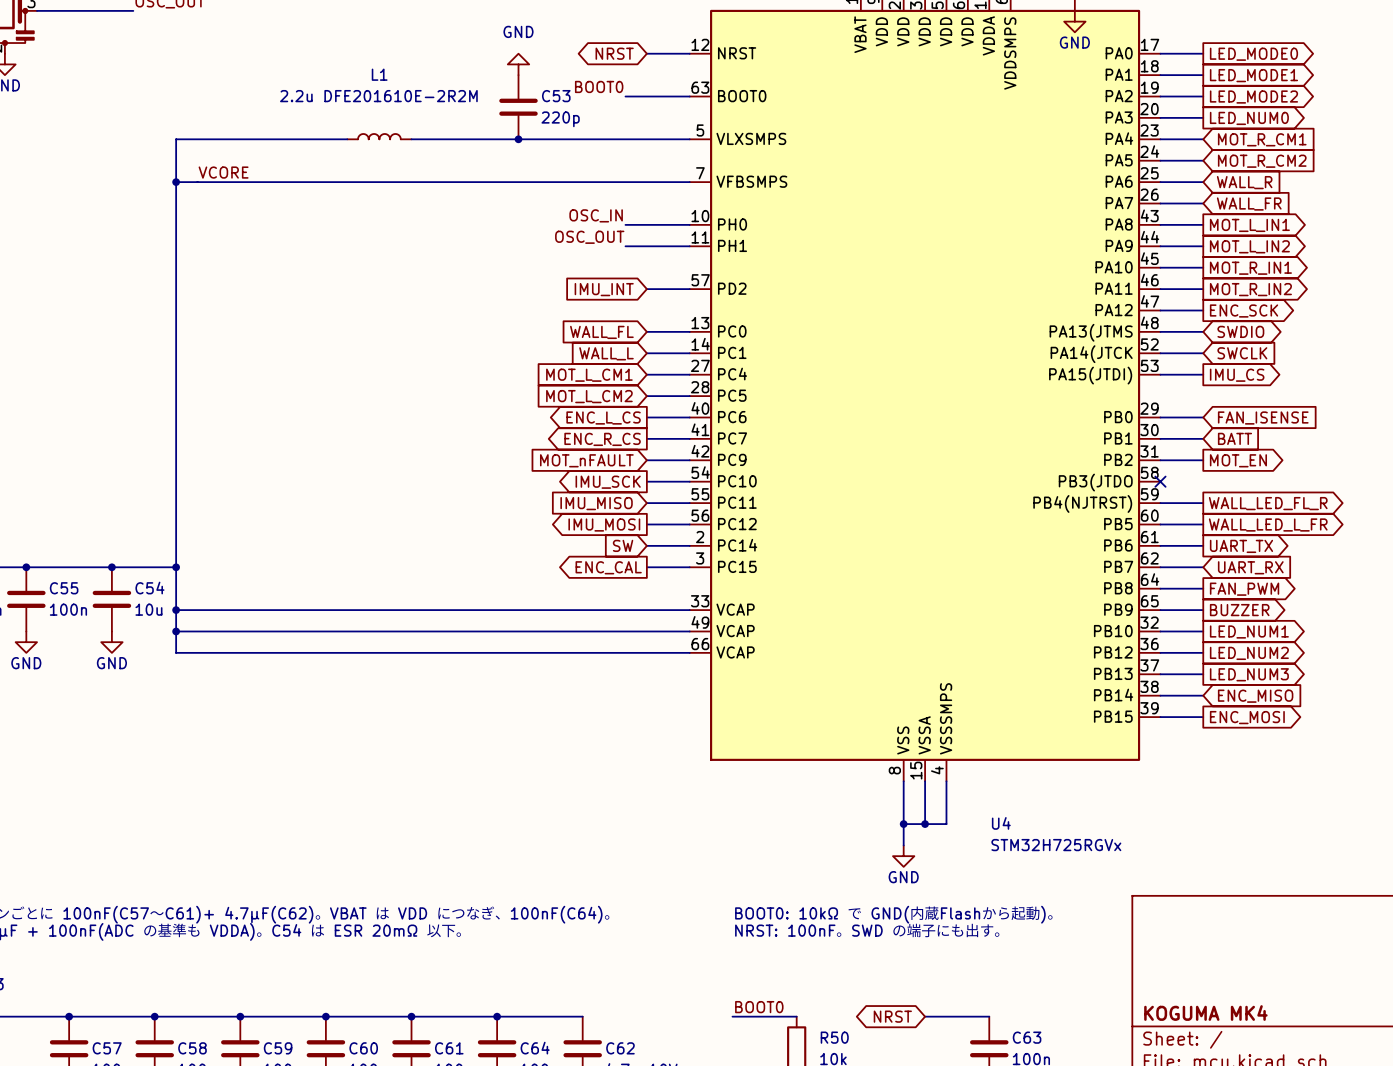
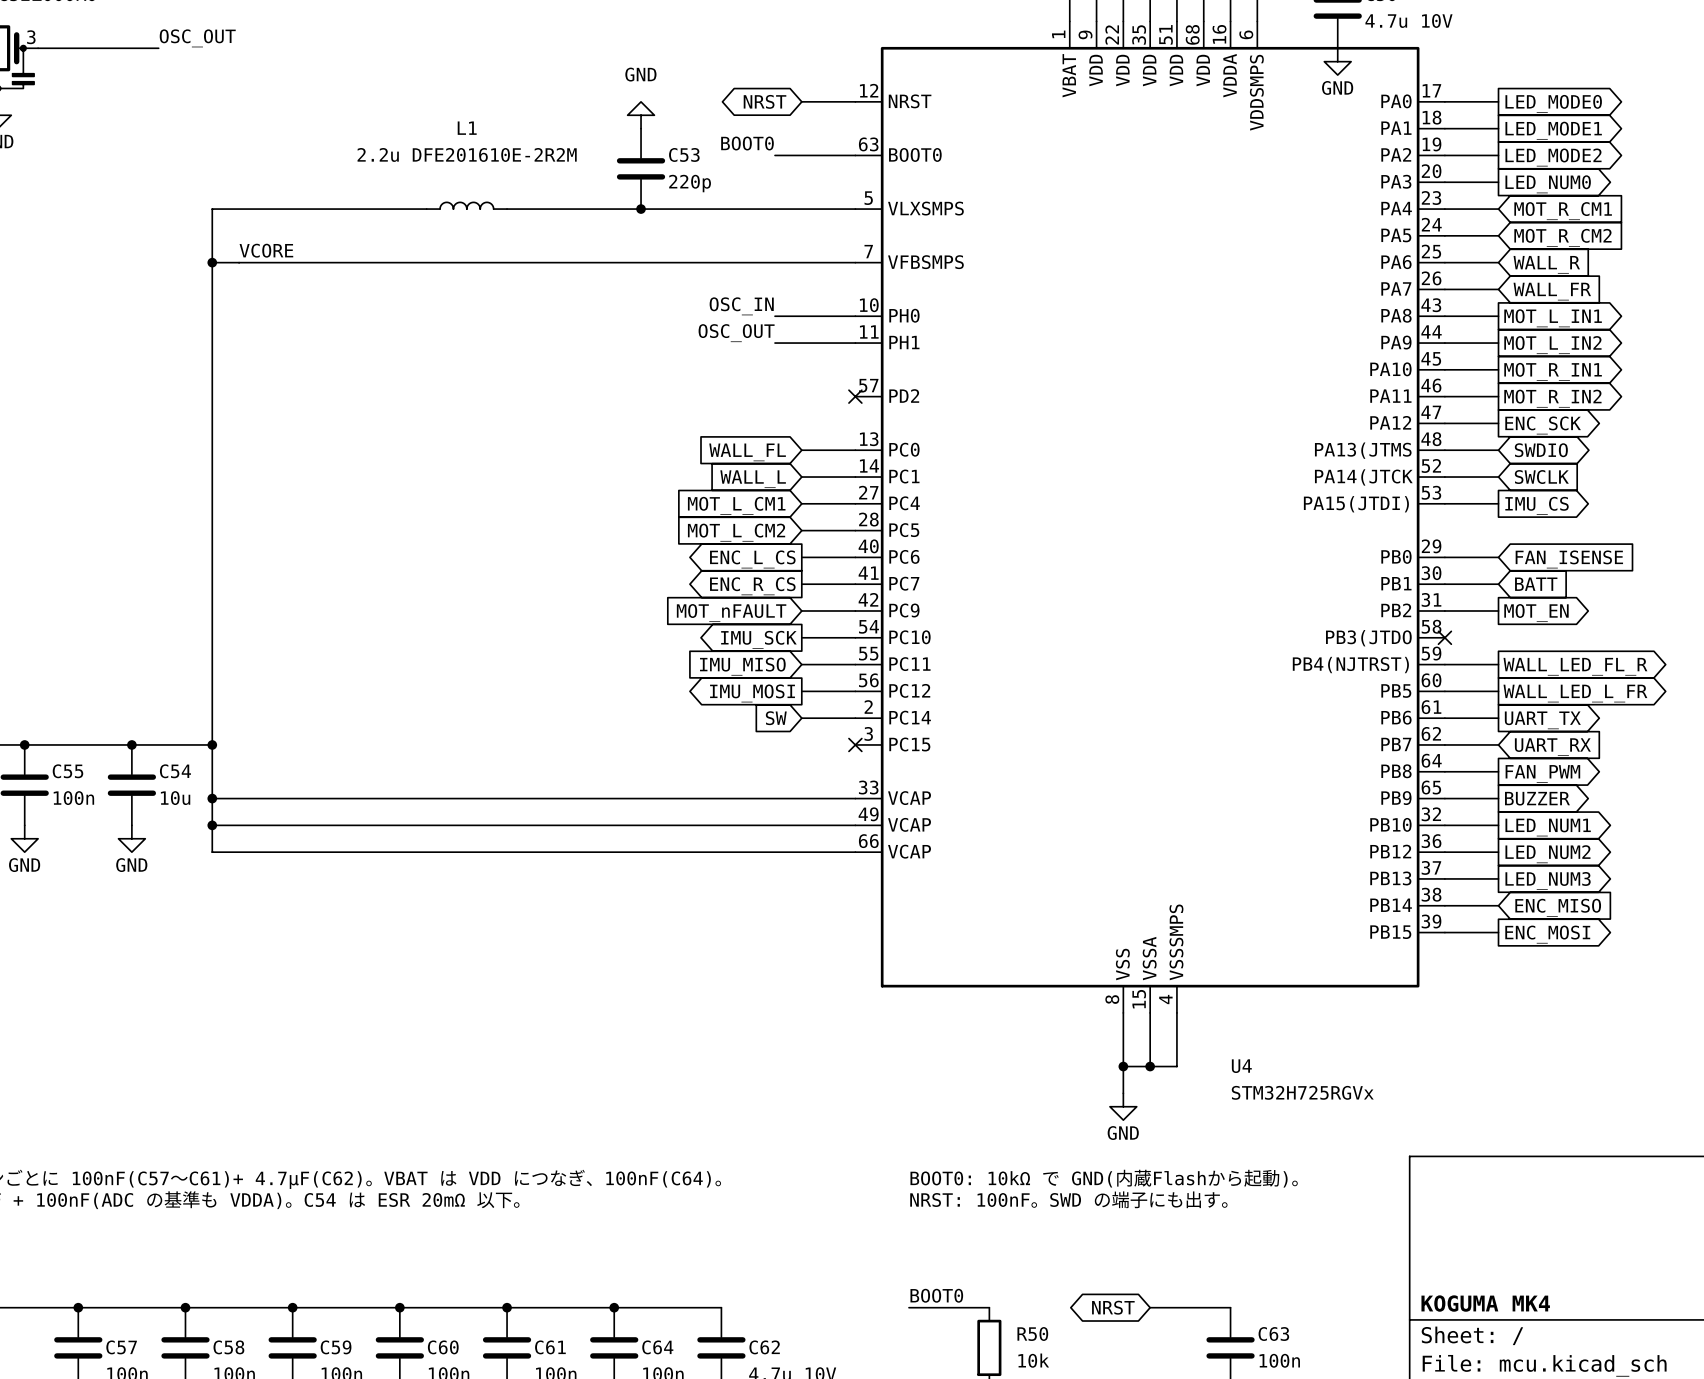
global label: IMU_INT (604, 289) -> none
wire: (646, 289) (689, 289) -> none
no-connect mark: none -> (855, 396)
global label: ENC_CAL (608, 567) -> none
wire: (646, 567) (689, 567) -> none
no-connect mark: none -> (855, 744)

